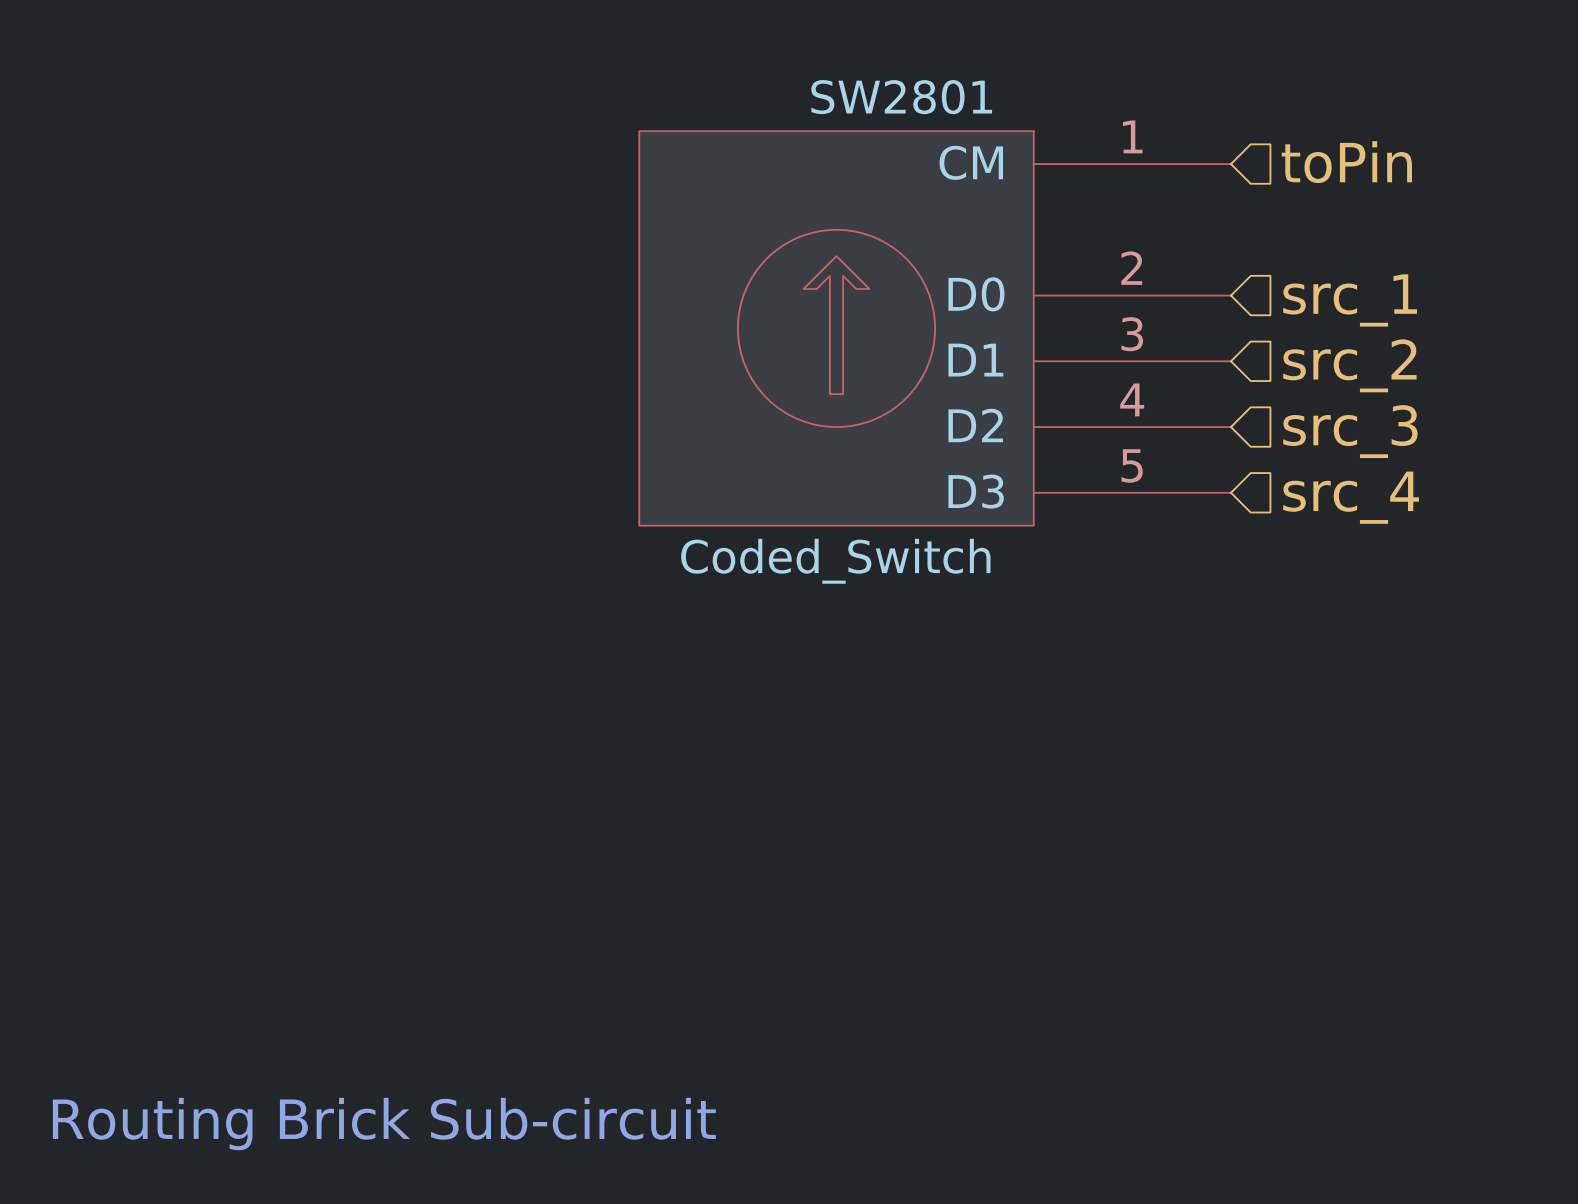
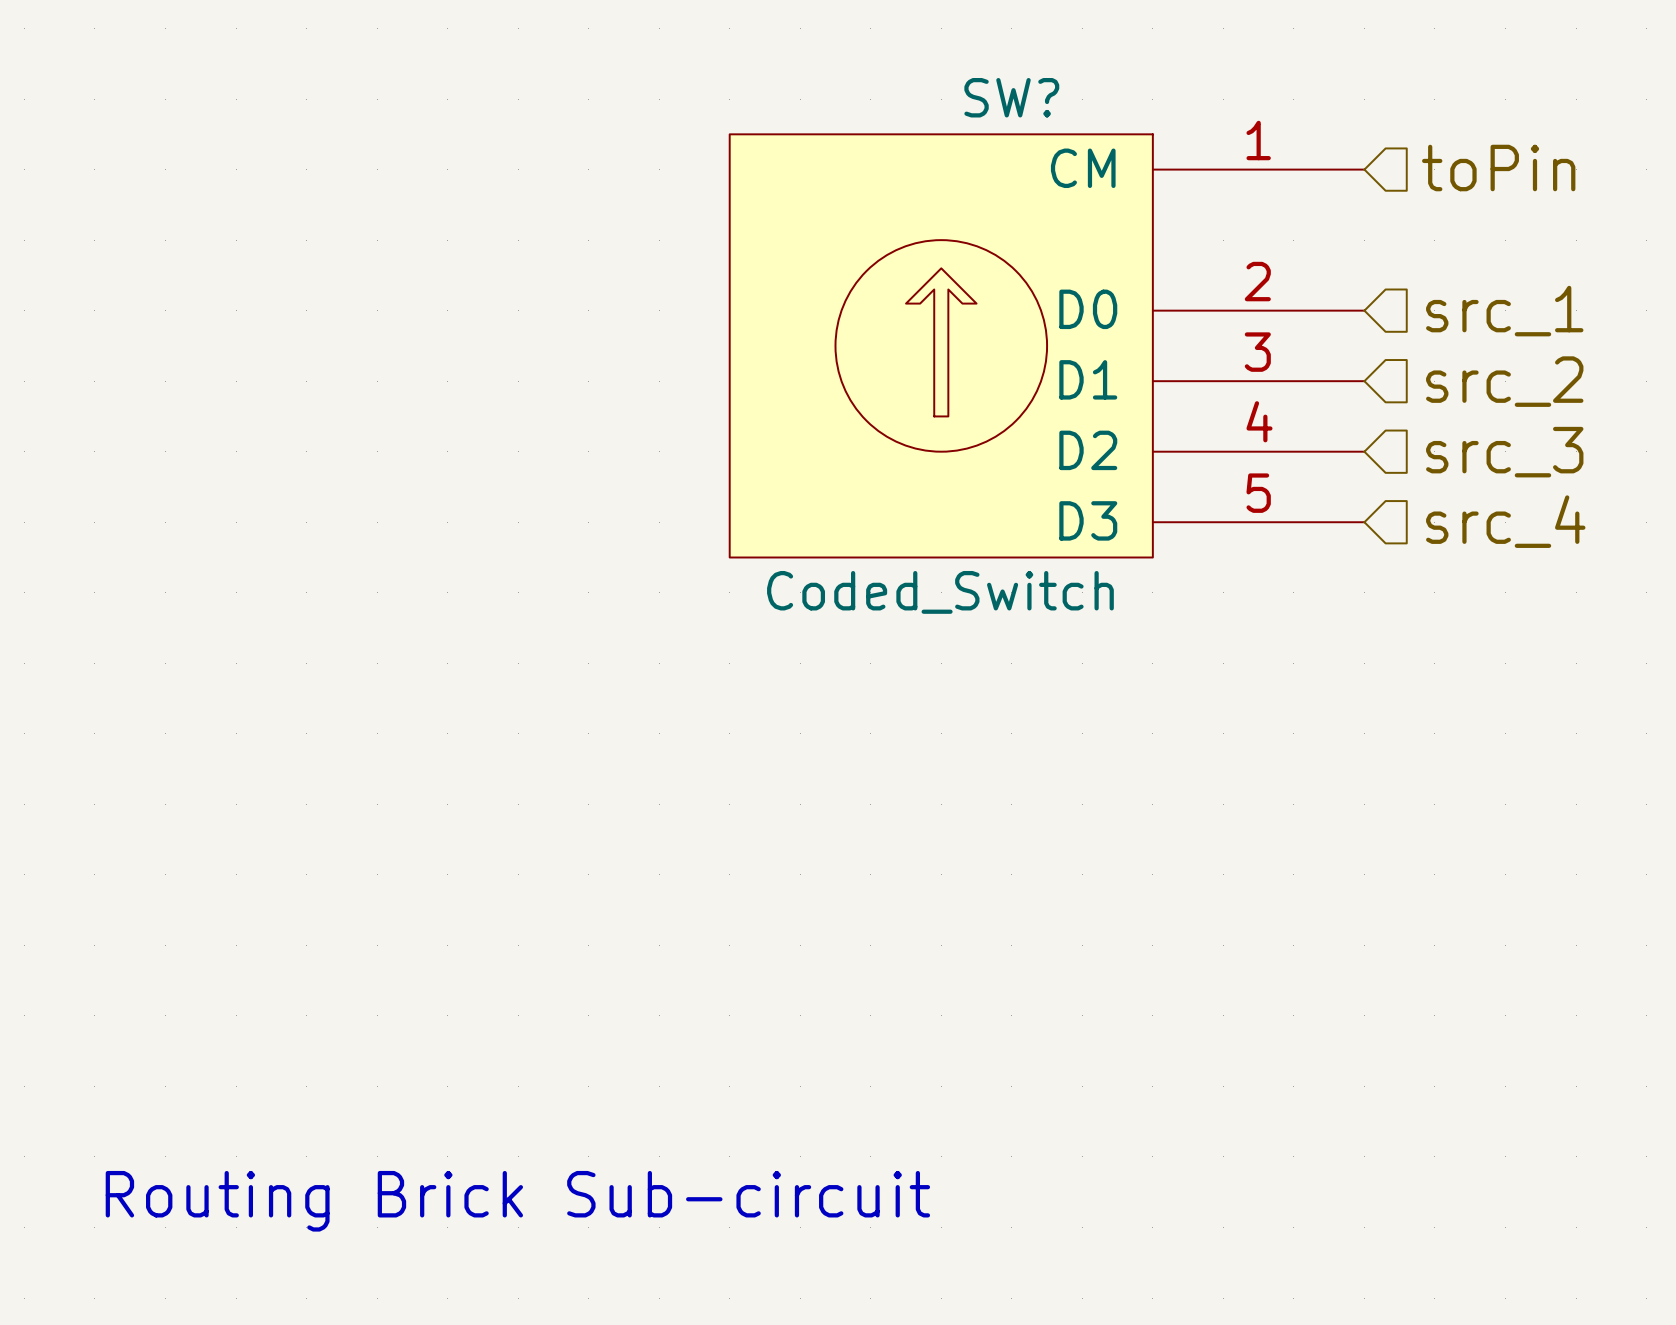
SW2801 name: SW2801 (901, 97) -> SW? (1011, 97)

